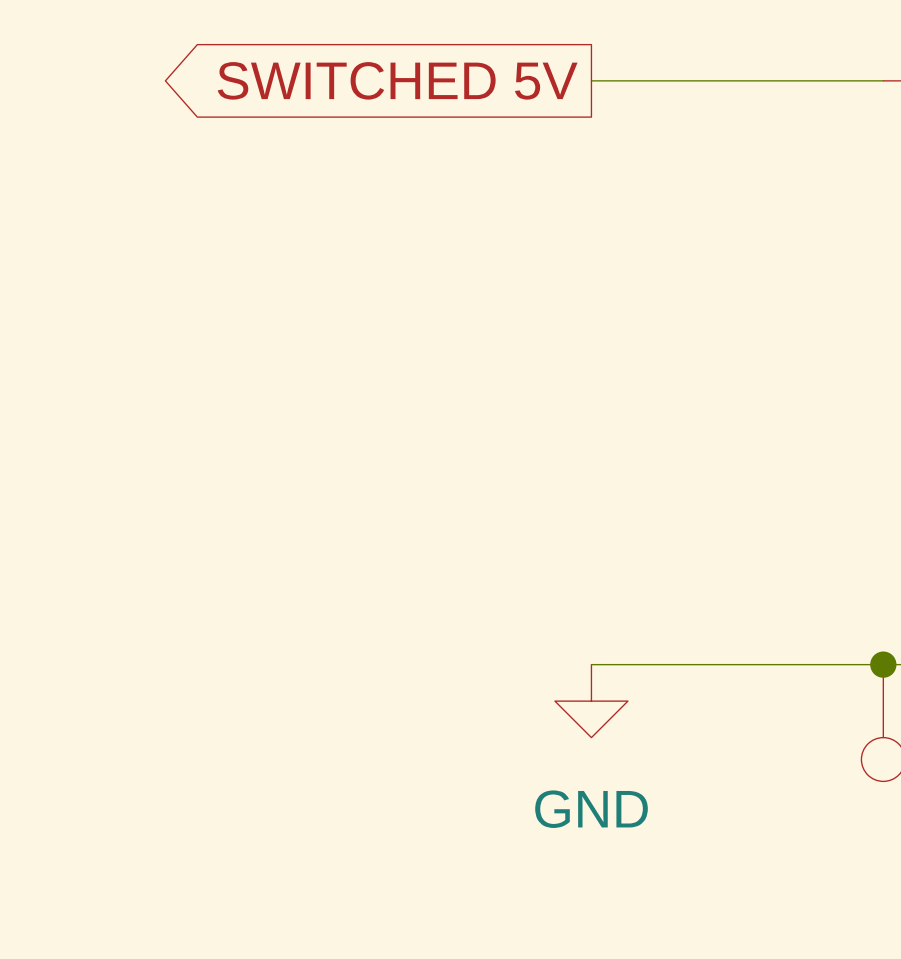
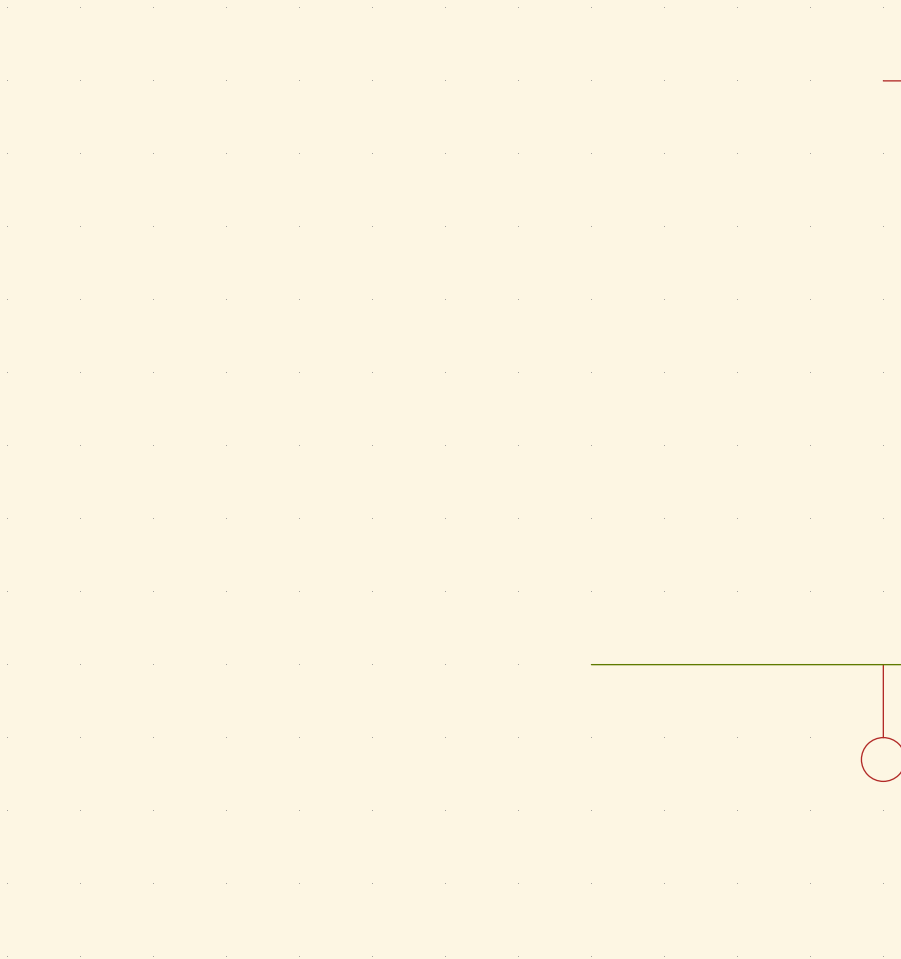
global label: SWITCHED 5V (397, 80) -> none
wire: (591, 80) (883, 80) -> none
junction: (883, 664) -> none
power symbol: GND (591, 701) -> none

